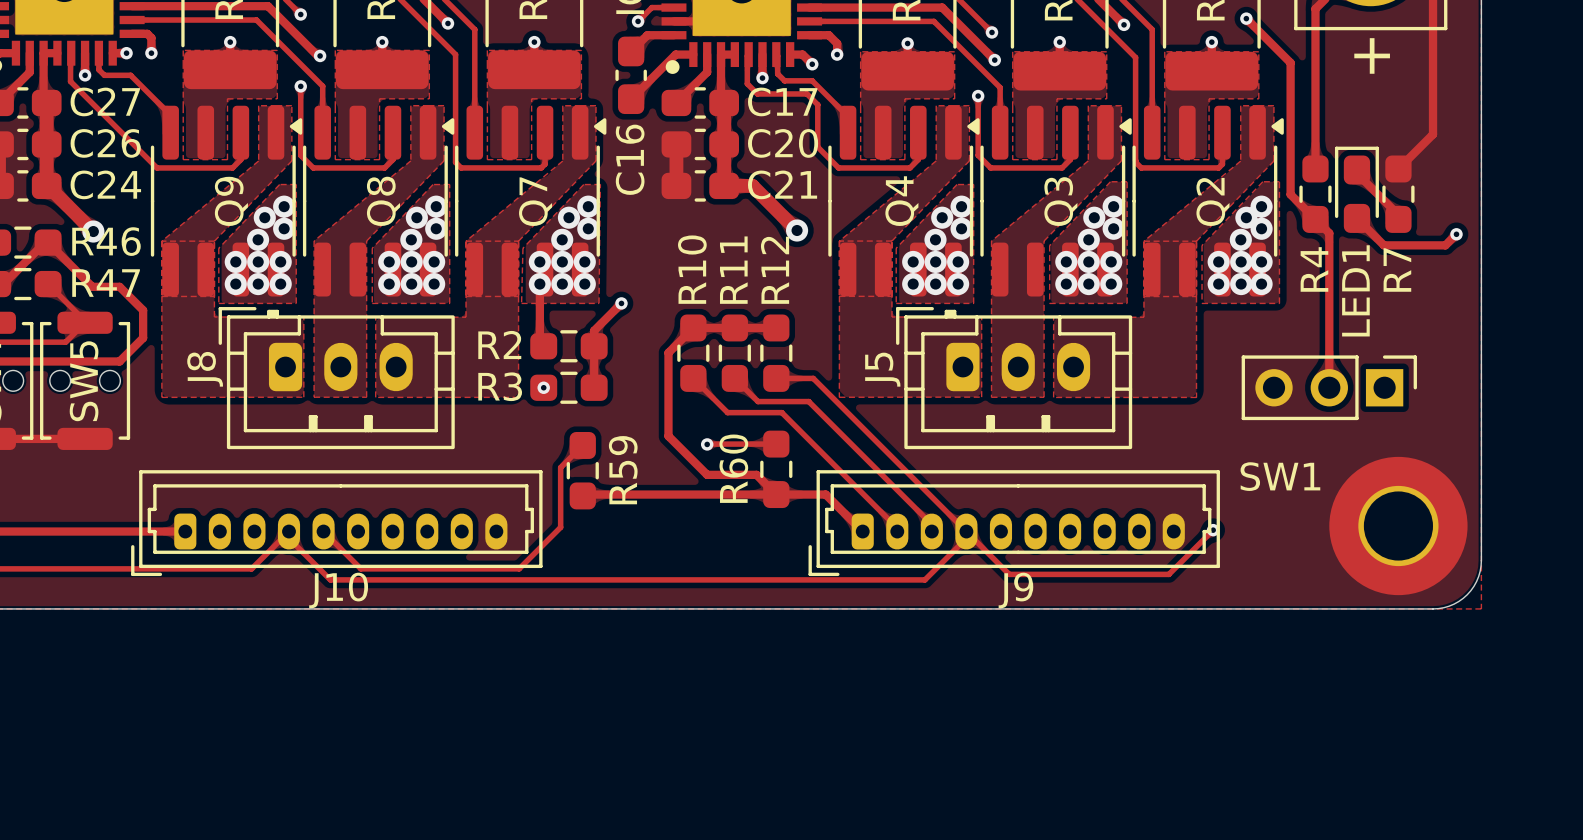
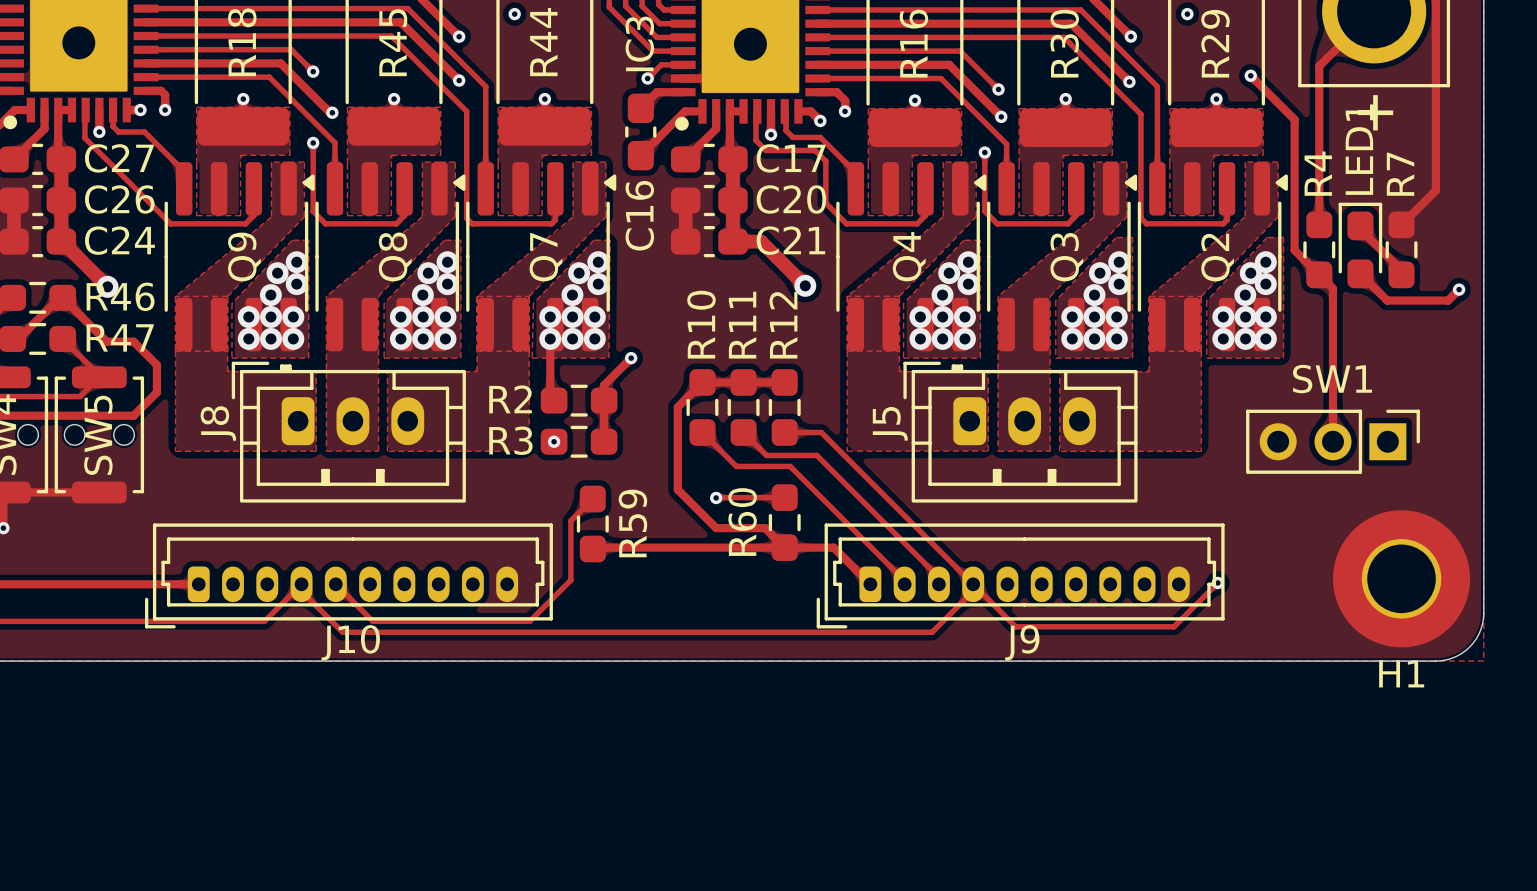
R4 name position: R4 (1314, 269) -> R4 (1318, 173)
R7 name position: R7 (1397, 270) -> R7 (1400, 174)
LED1 name position: LED1 (1355, 290) -> LED1 (1359, 149)
SW1 name position: SW1 (1280, 476) -> SW1 (1332, 379)
H1 name: none -> H1 (1401, 673)

